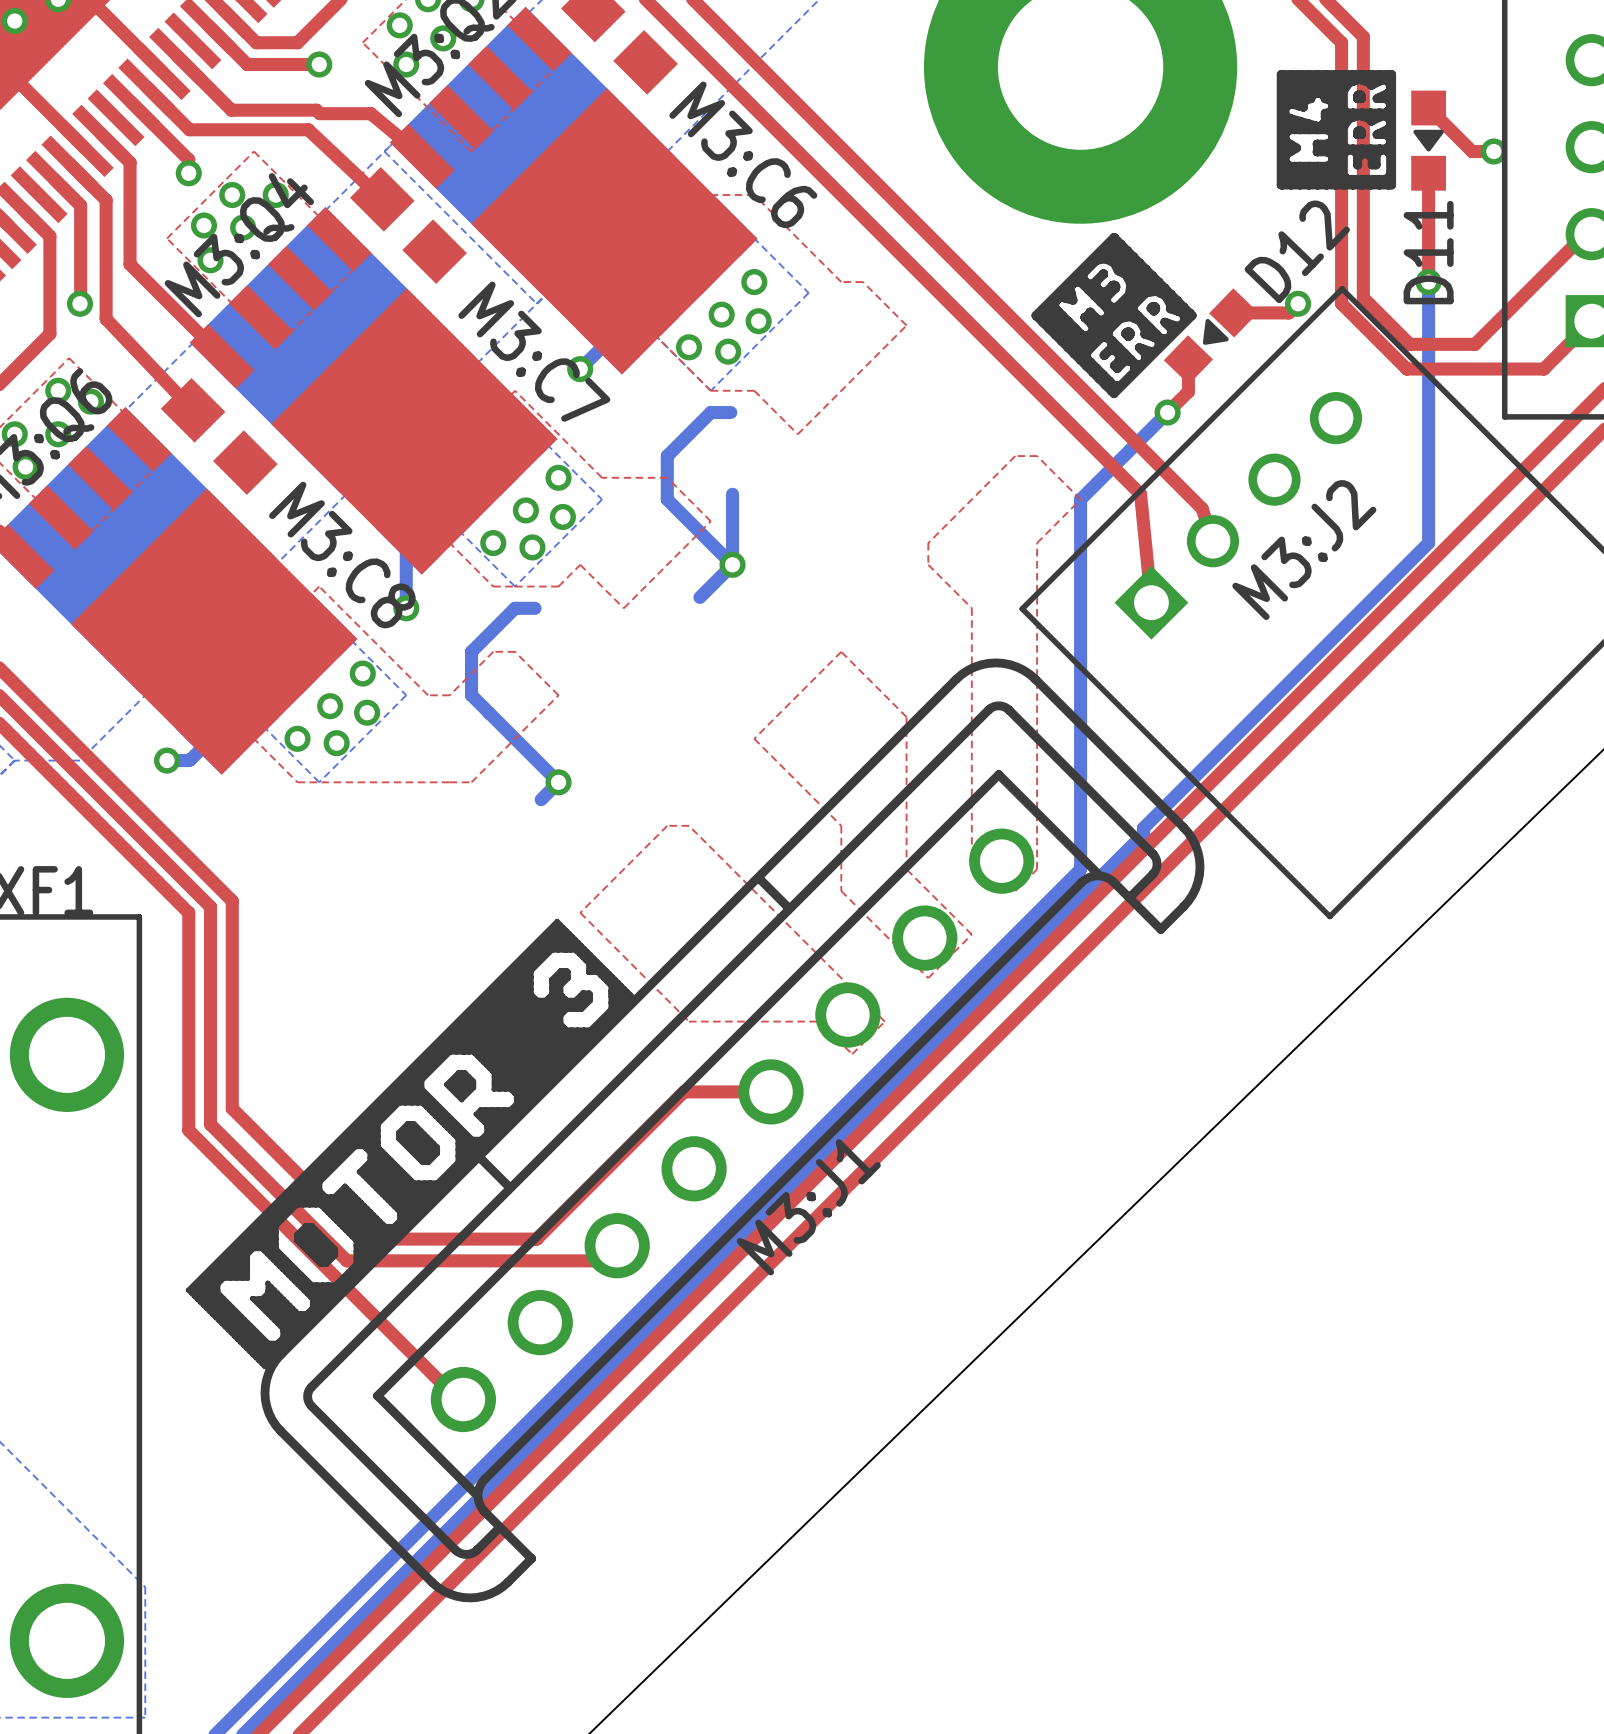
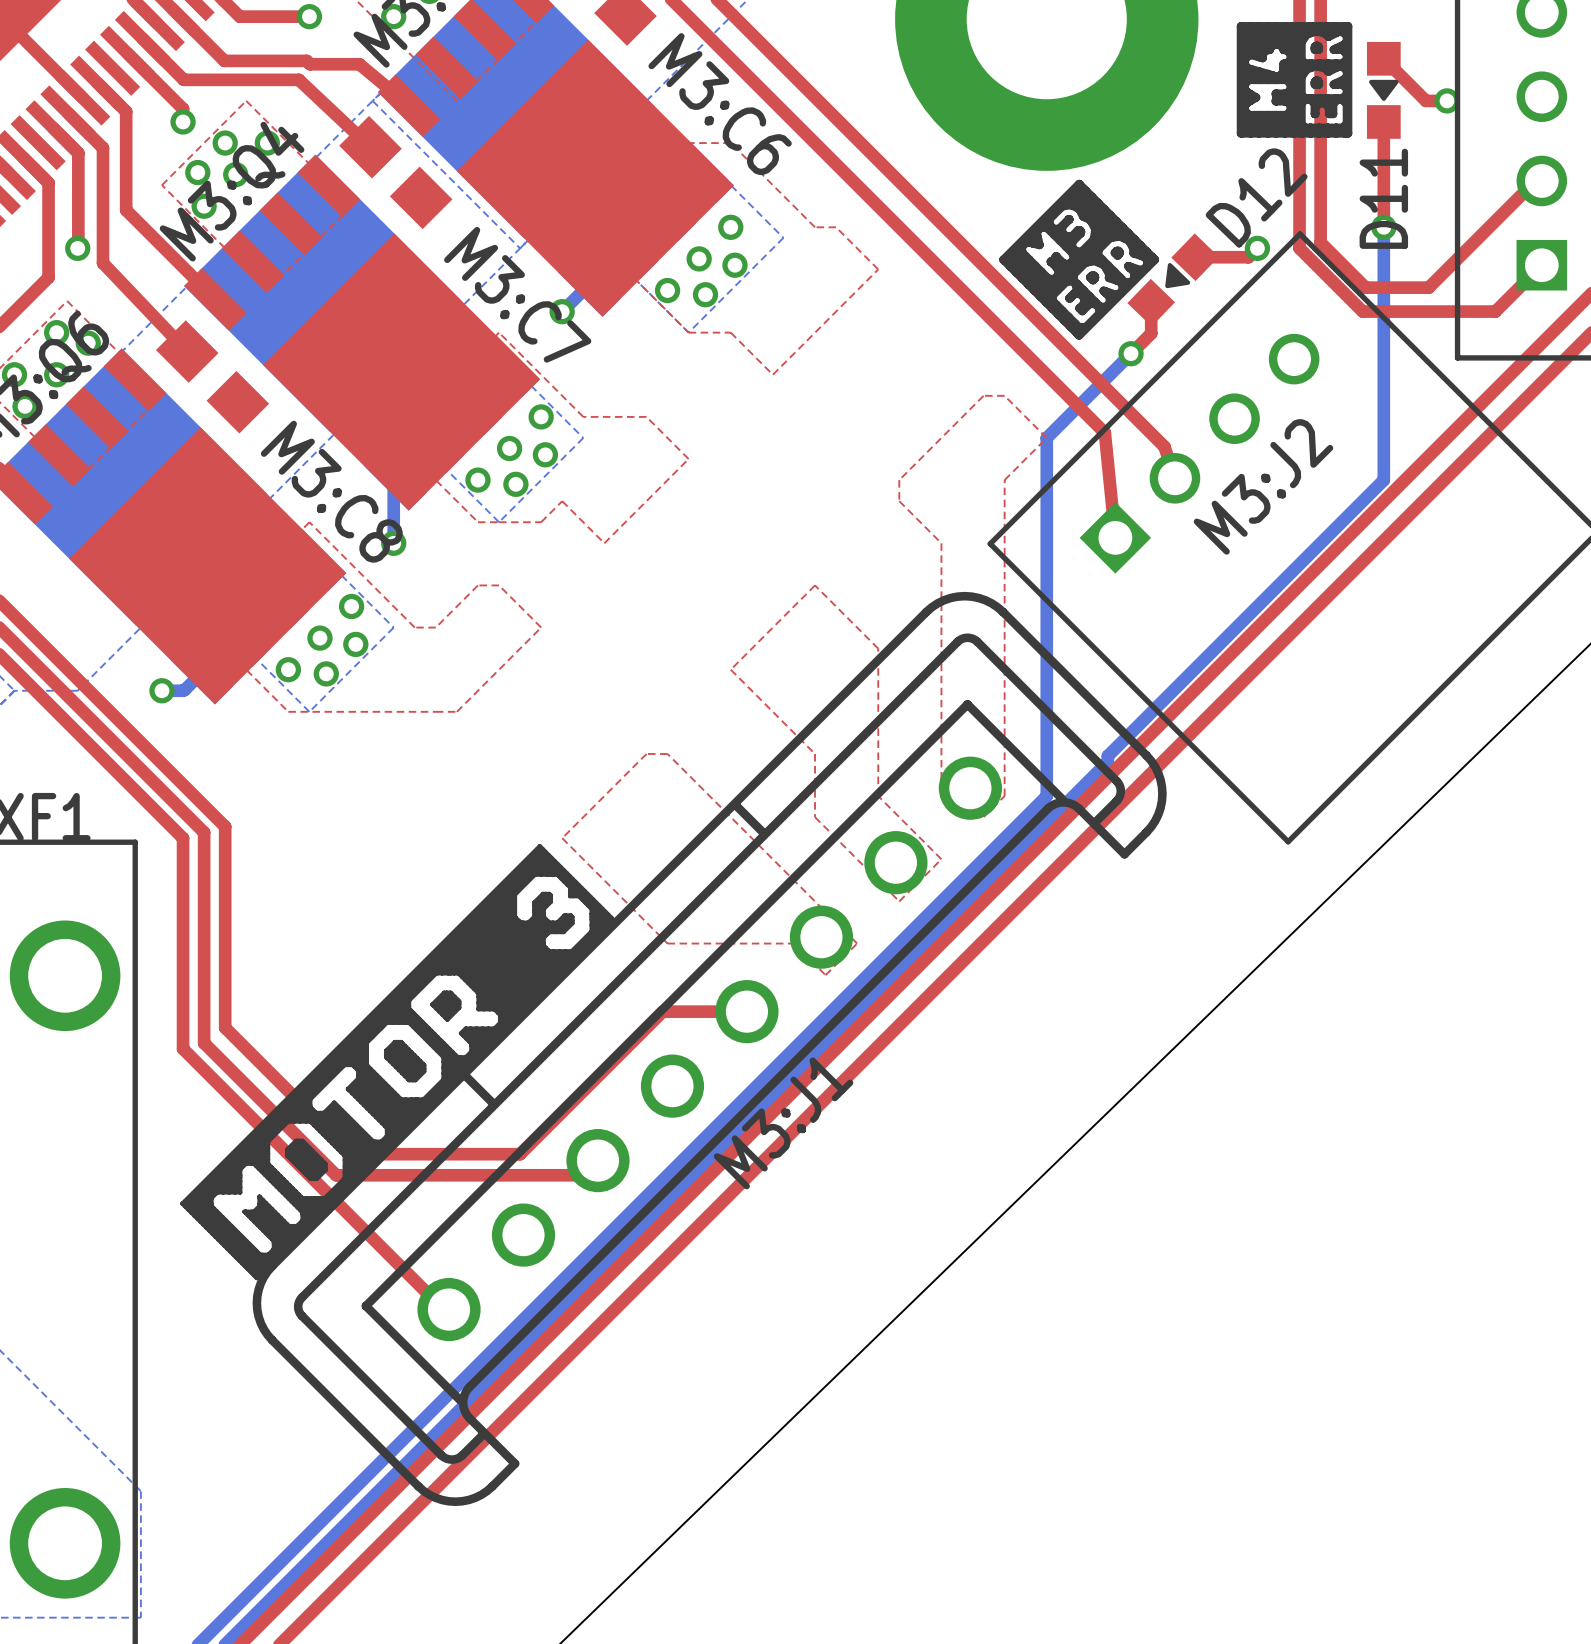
bottom track: (730, 412) (710, 412) (667, 456) (667, 499) (732, 564) -> none
bottom track: (732, 494) (732, 564) -> none
bottom track: (732, 564) (699, 597) -> none
via: (732, 564) -> none
bottom track: (535, 608) (515, 608) (471, 651) (471, 695) (558, 782) (541, 799) -> none
via: (558, 782) -> none

